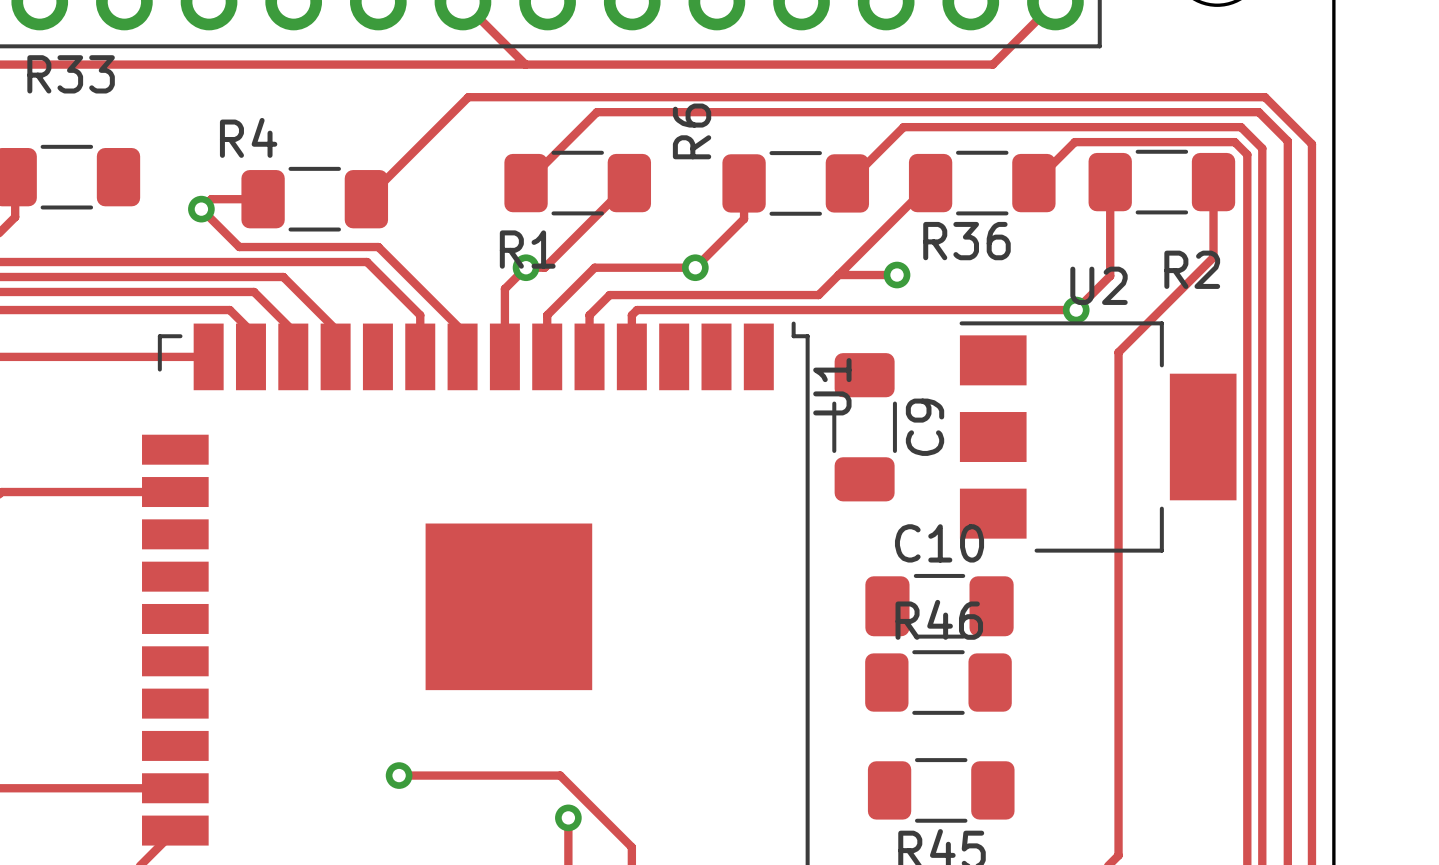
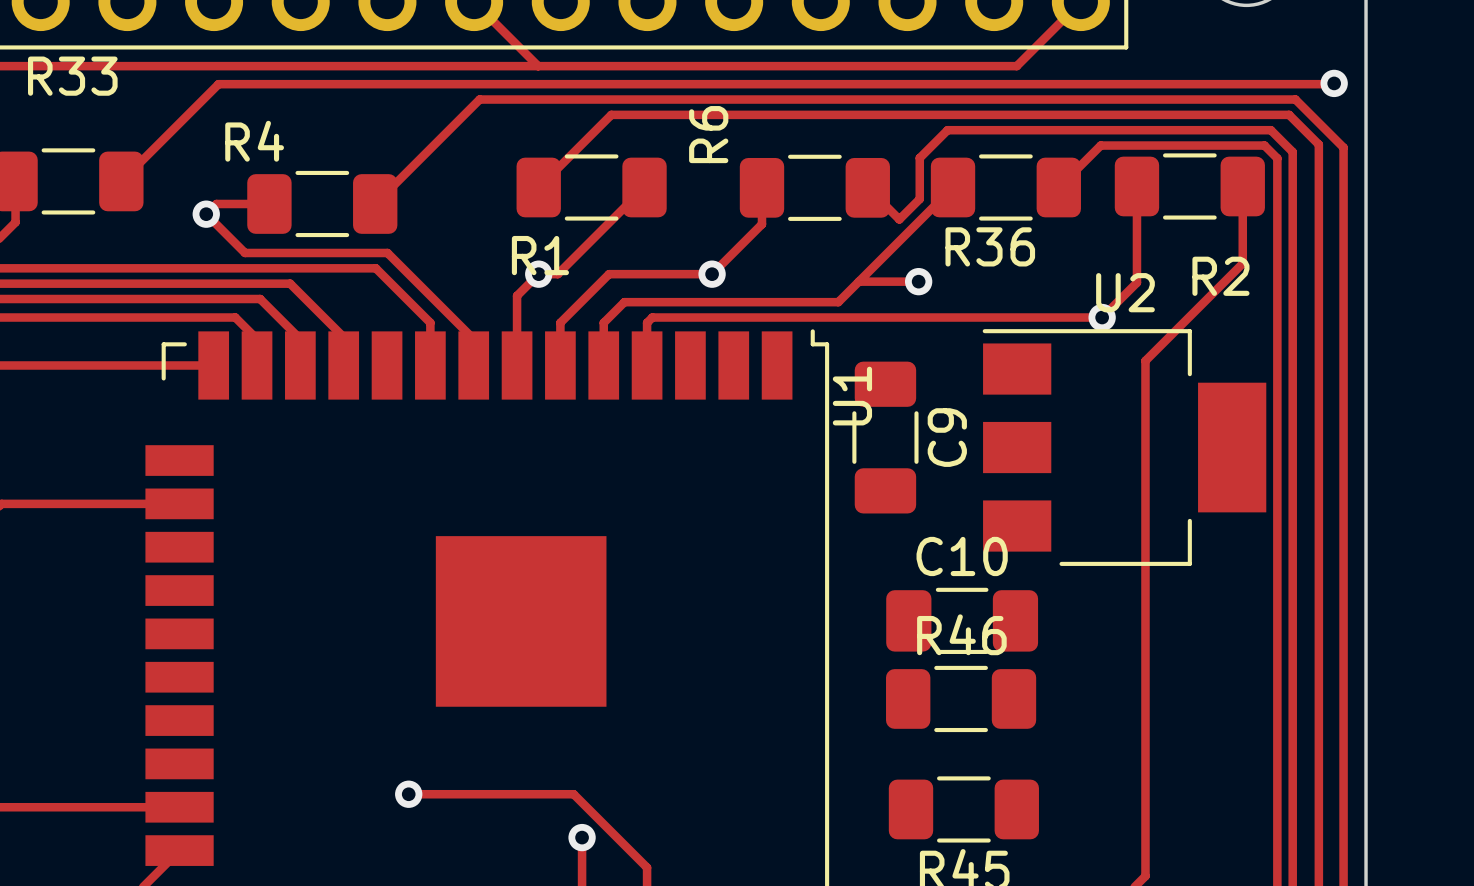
track: none -> (1334, 83) (218, 84) (121, 181)
via: none -> (1334, 83)
track: (925, 127) (903, 127) (847, 183) -> (947, 130) (919, 158) (919, 199) (899, 219) (867, 187)

